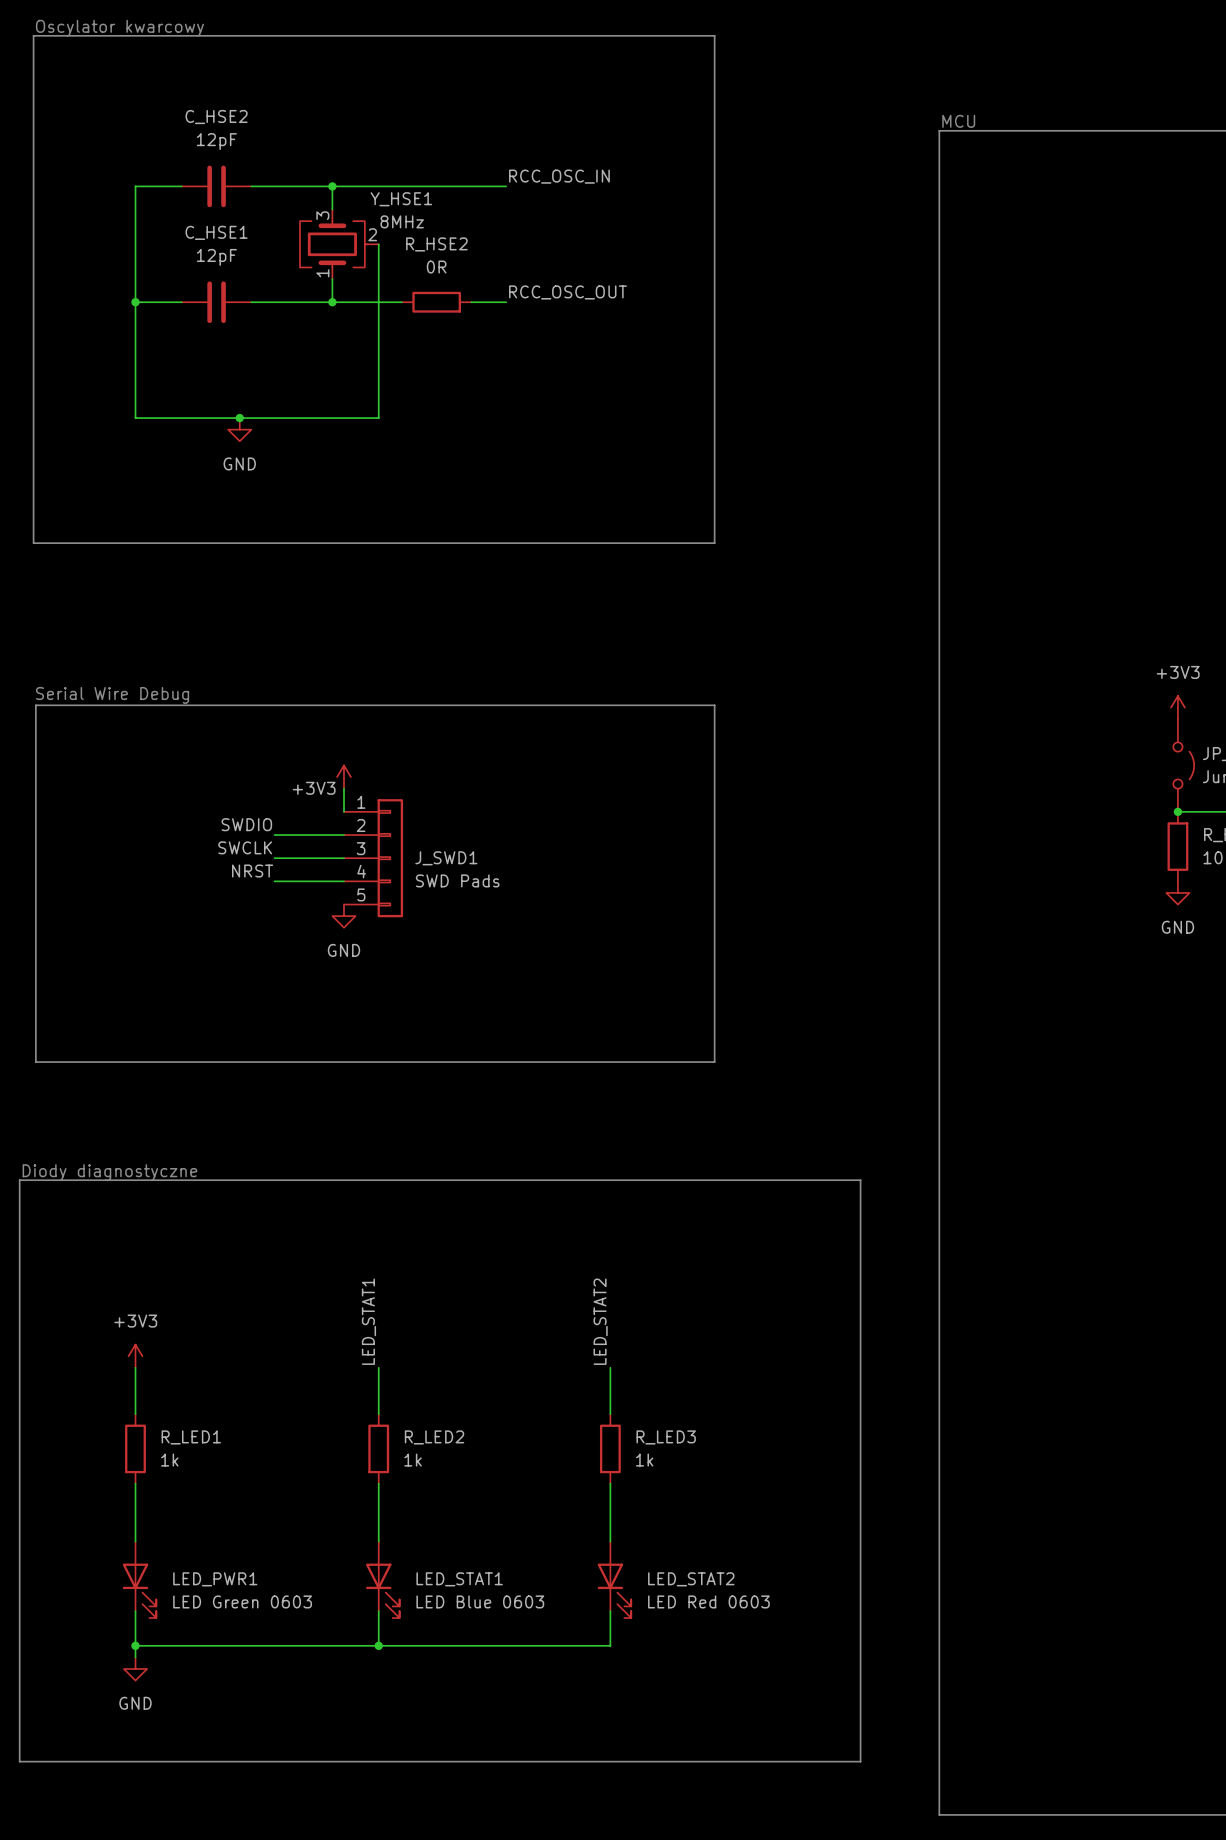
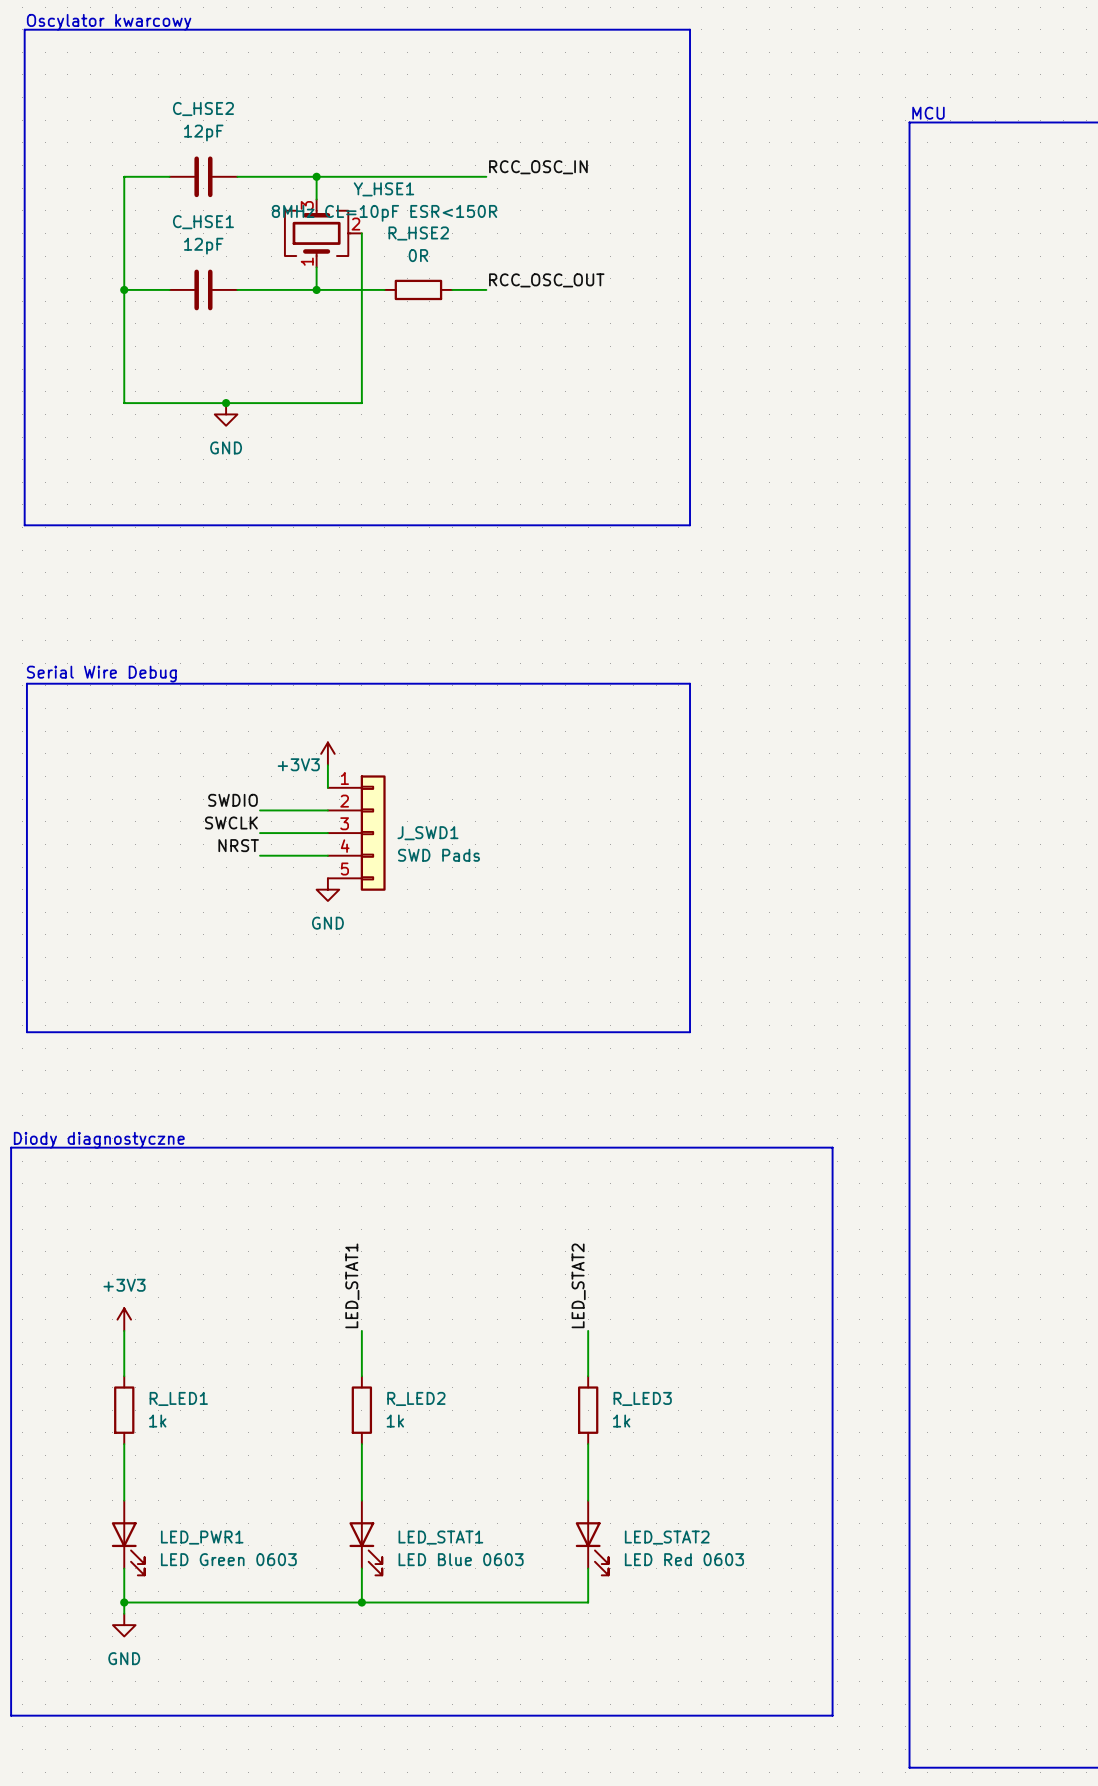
Y_HSE1 value: 8MHz (402, 221) -> 8MHz CL=10pF ESR<150R (384, 213)

